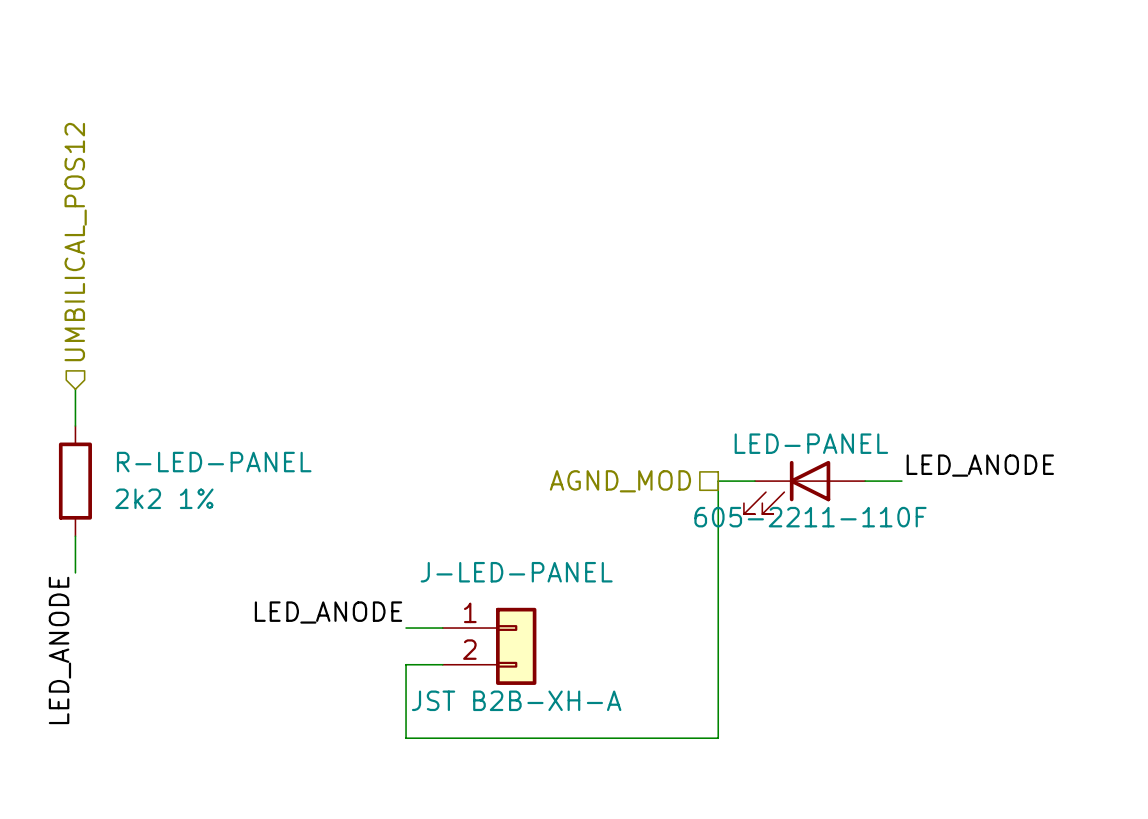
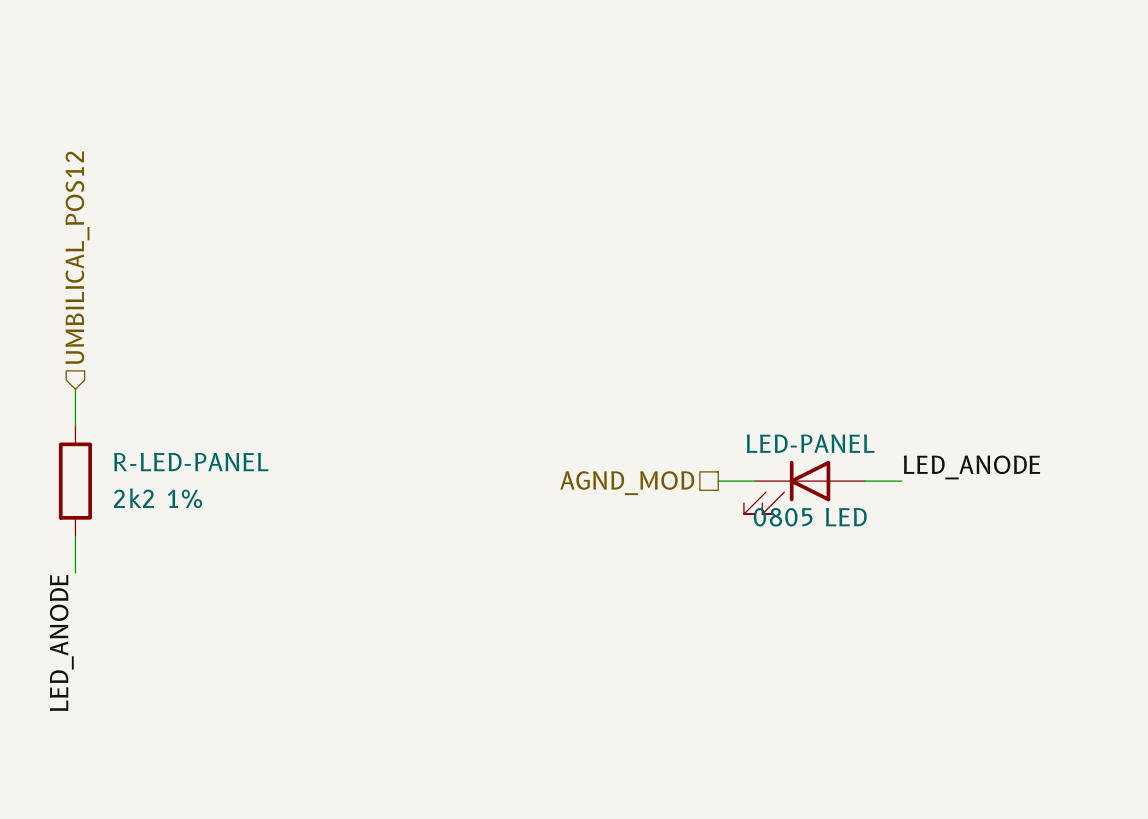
wire: (718, 481) (718, 738) (406, 738) (406, 664) (442, 664) -> none
LED-PANEL value: 605-2211-110F (810, 517) -> 0805 LED (810, 517)
label: LED_ANODE (328, 612) -> none
wire: (406, 628) (442, 628) -> none
J-LED-PANEL: JST B2B-XH-A (489, 646) -> none

